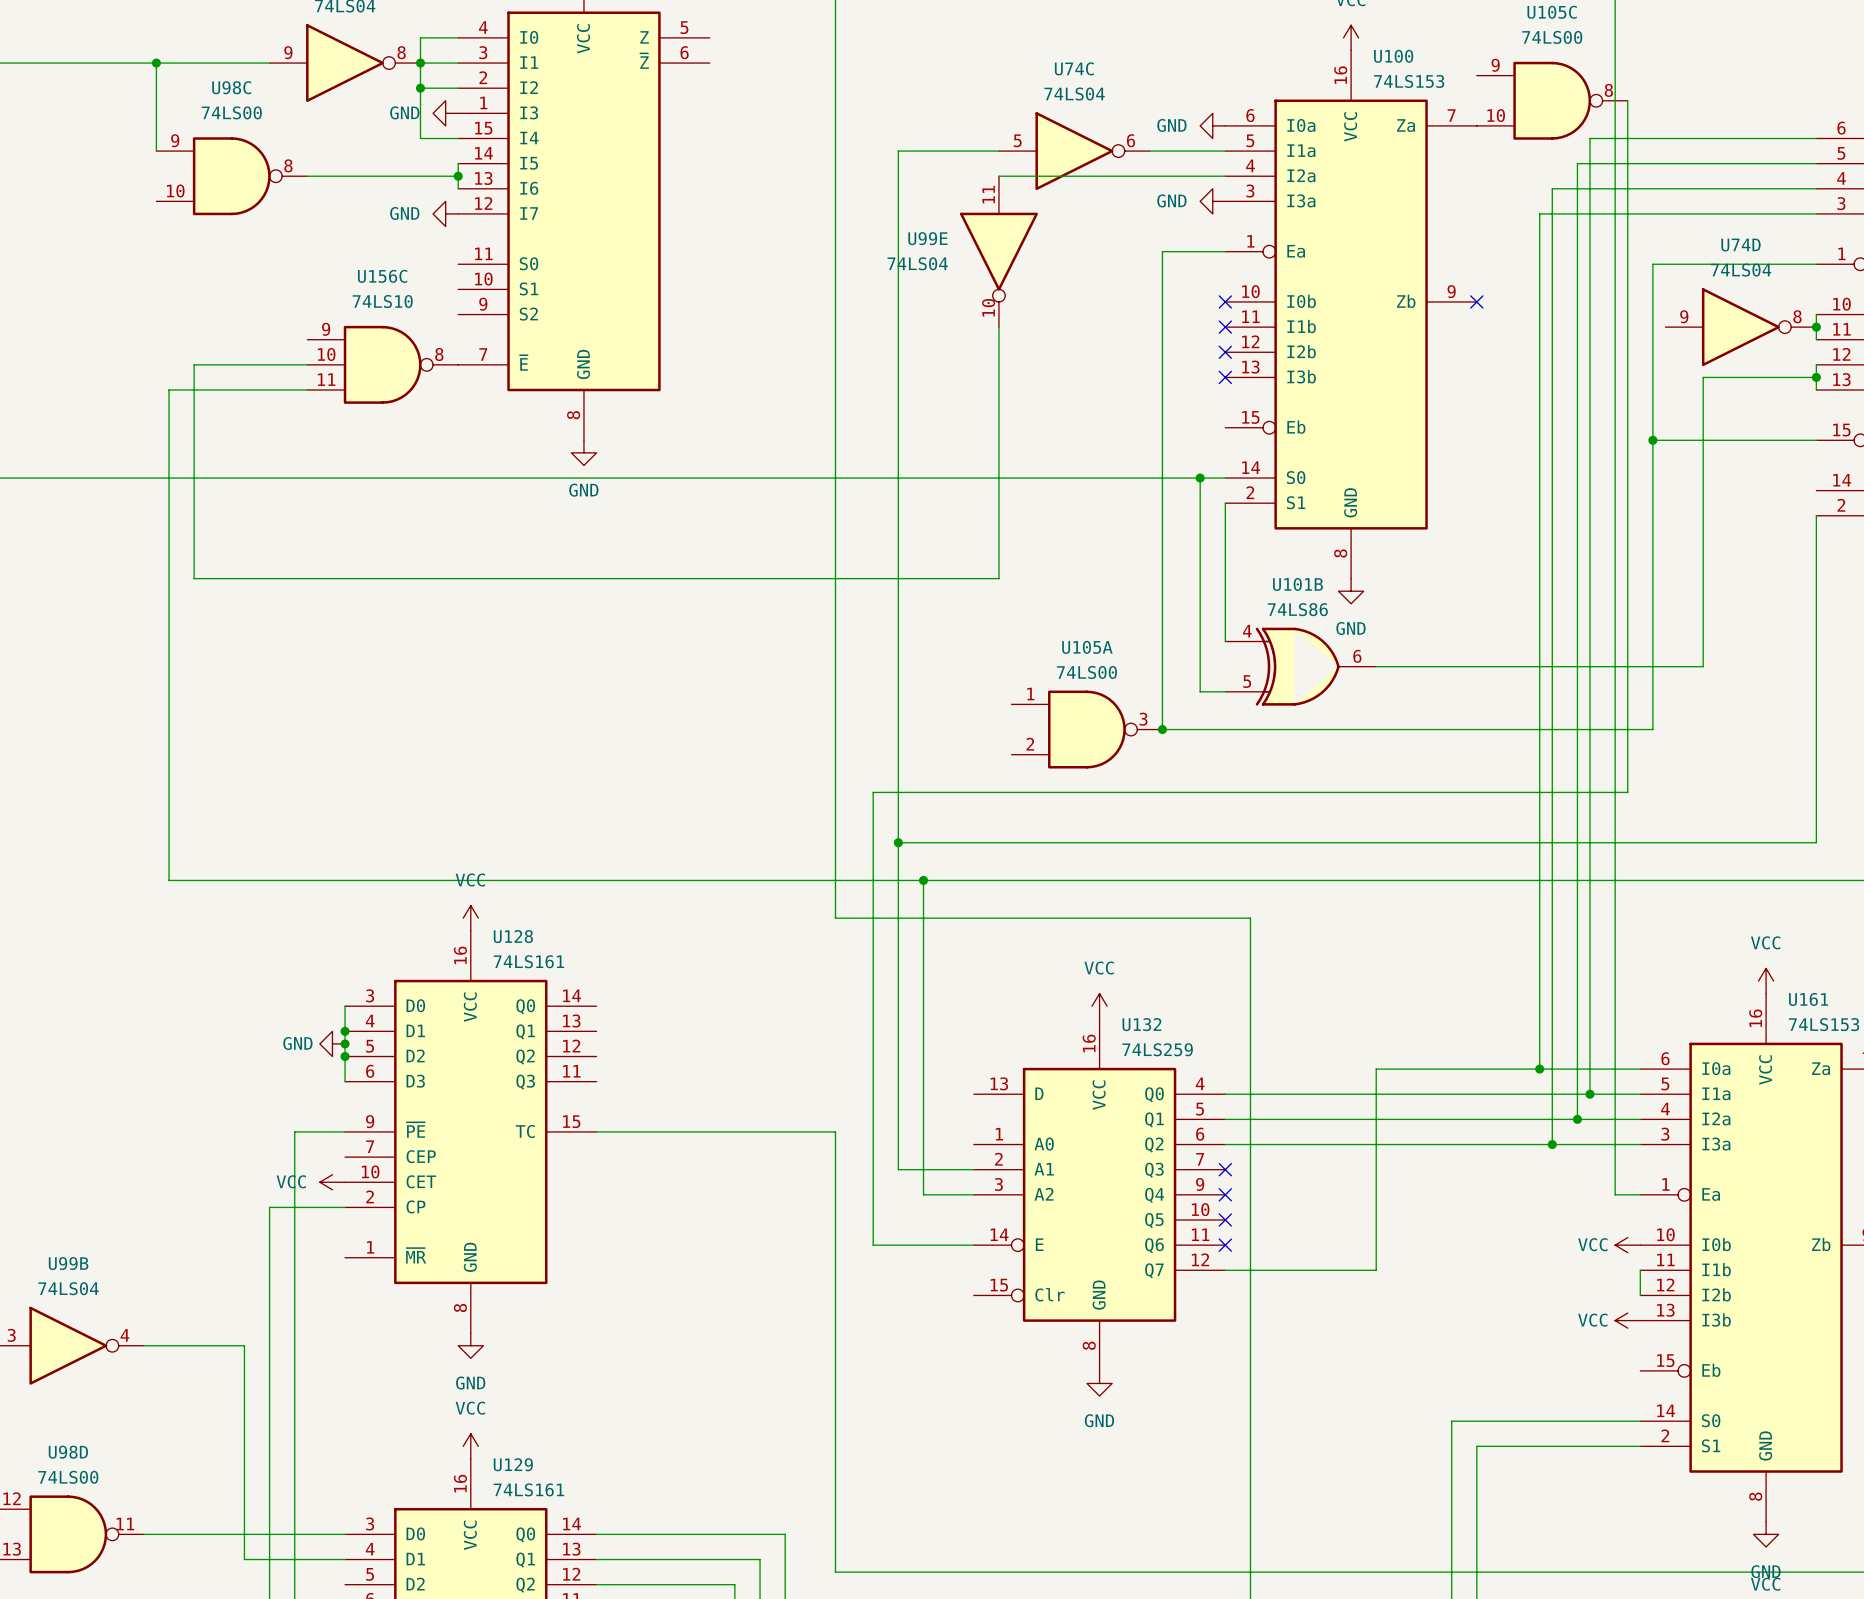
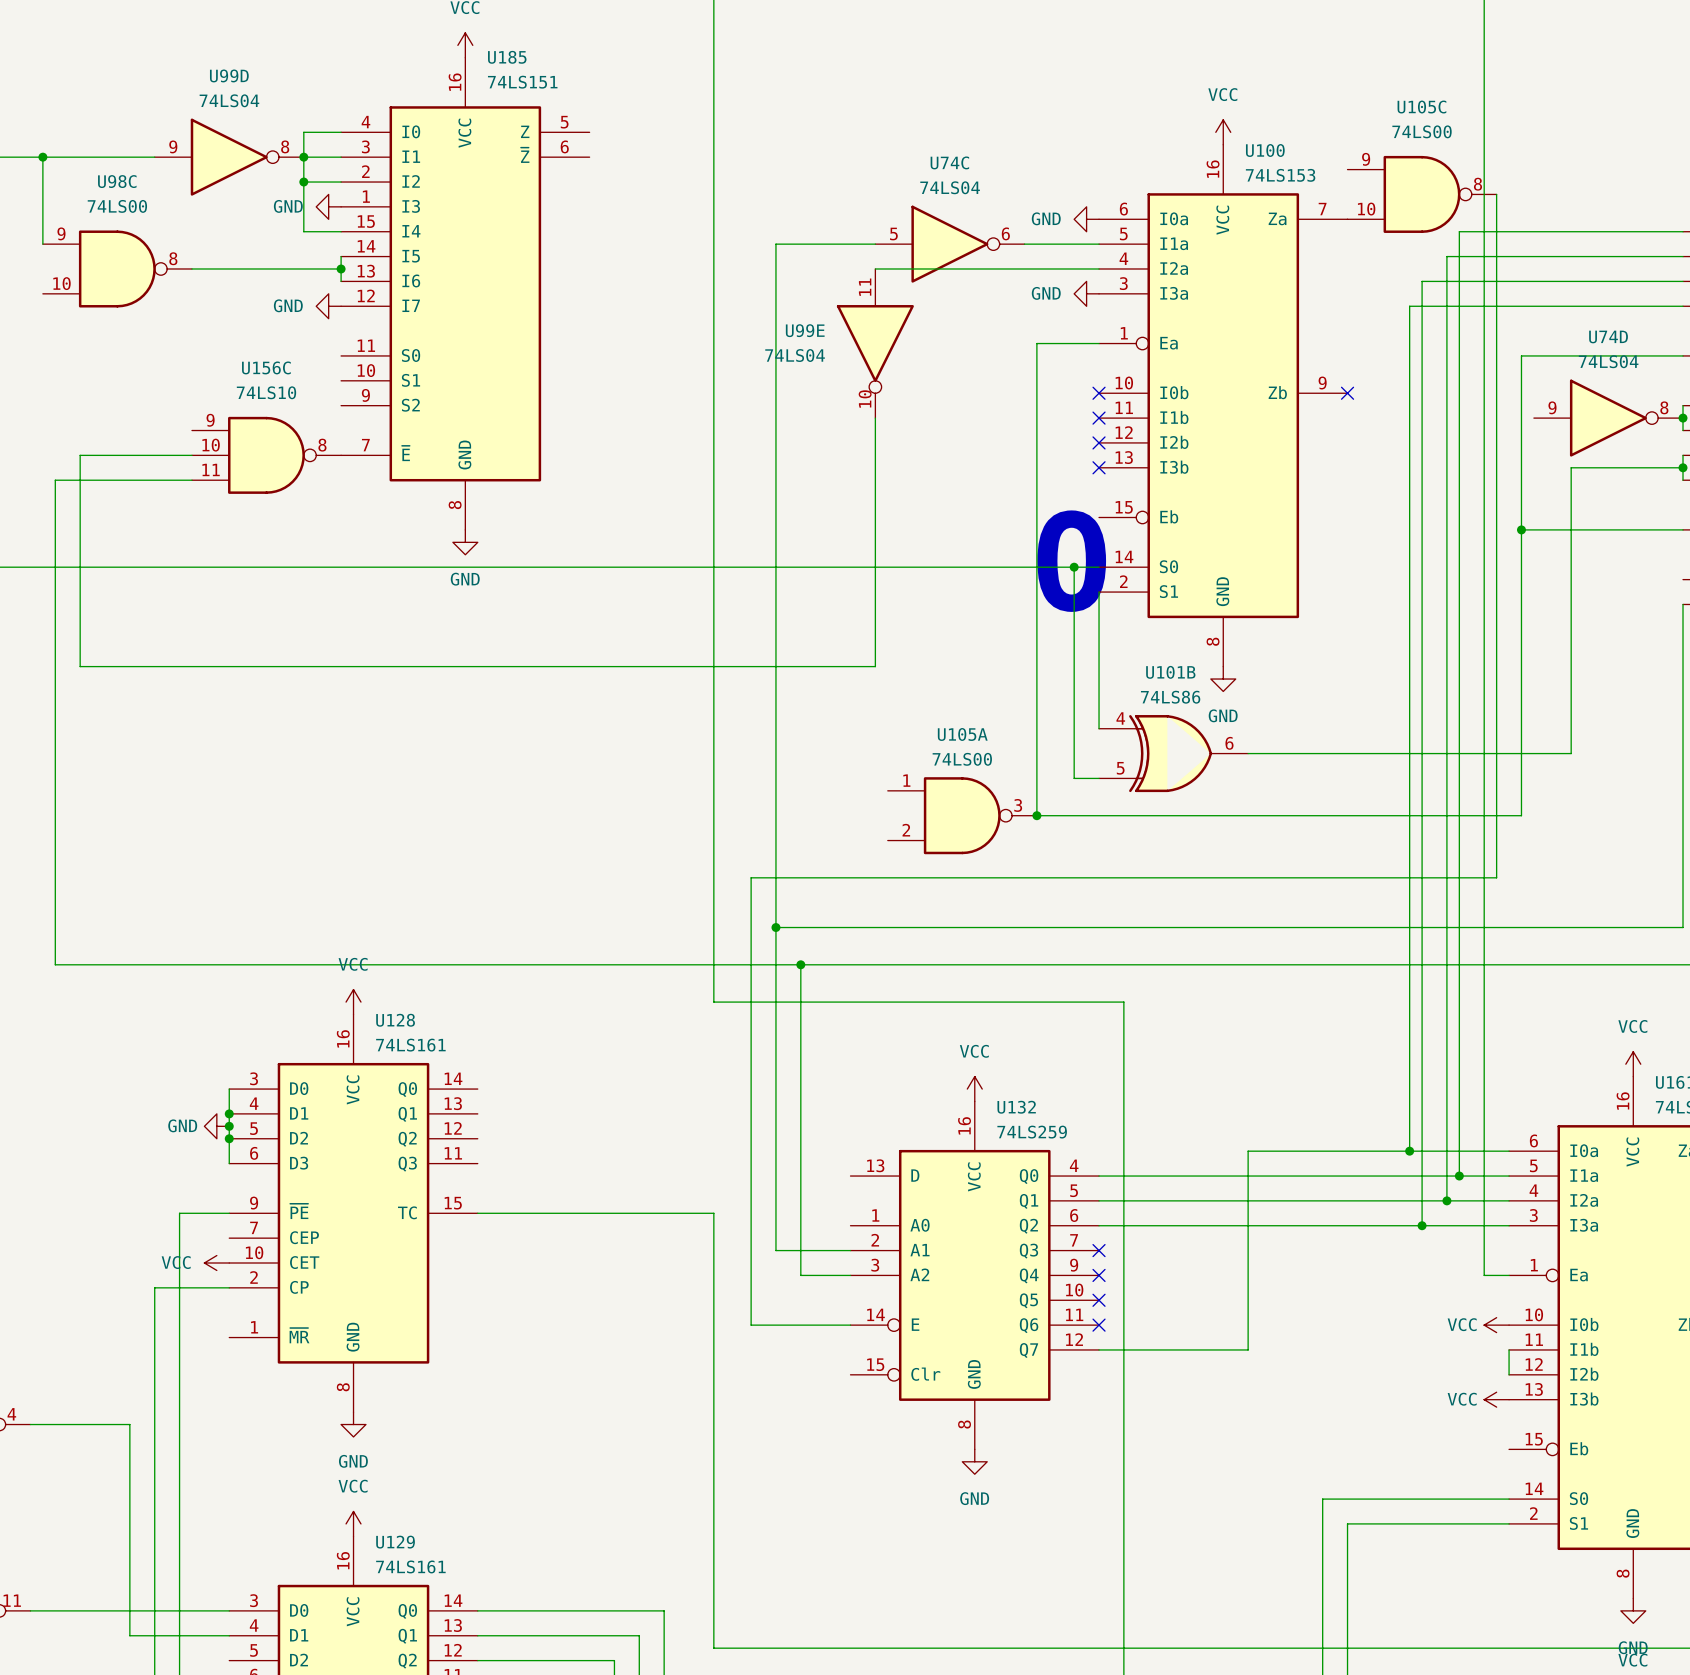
text: none -> O (1071, 561)

